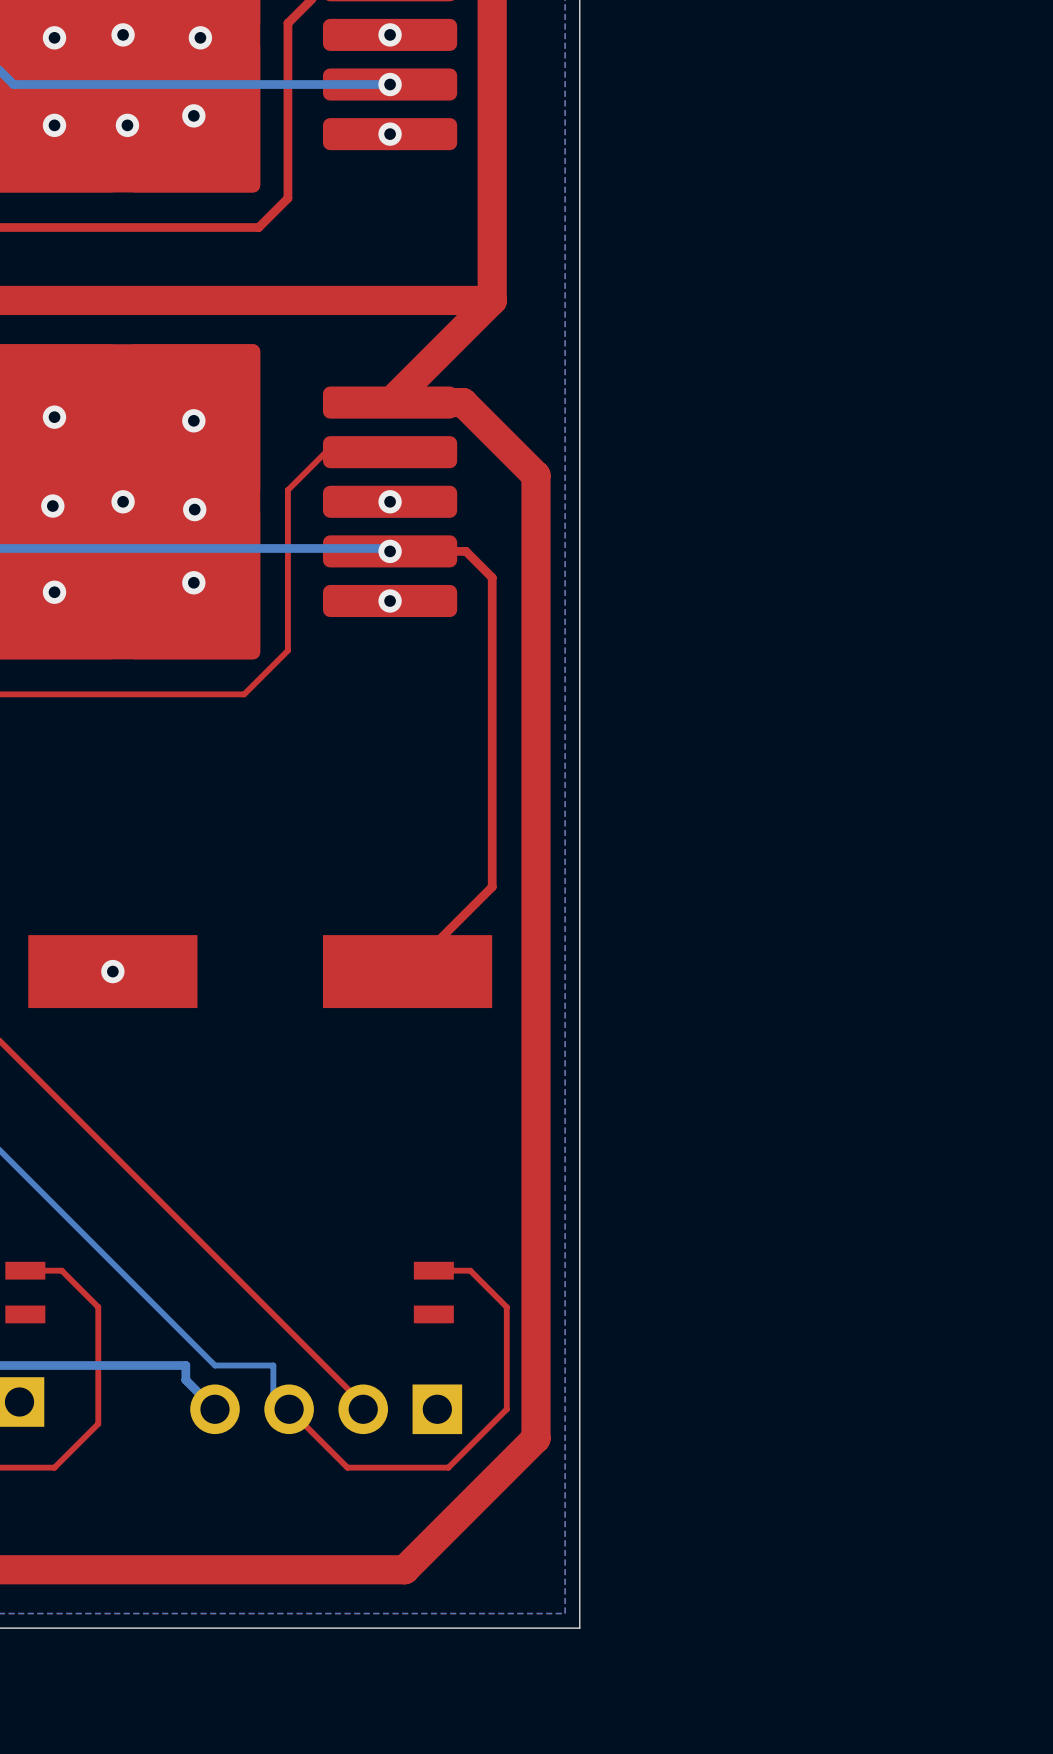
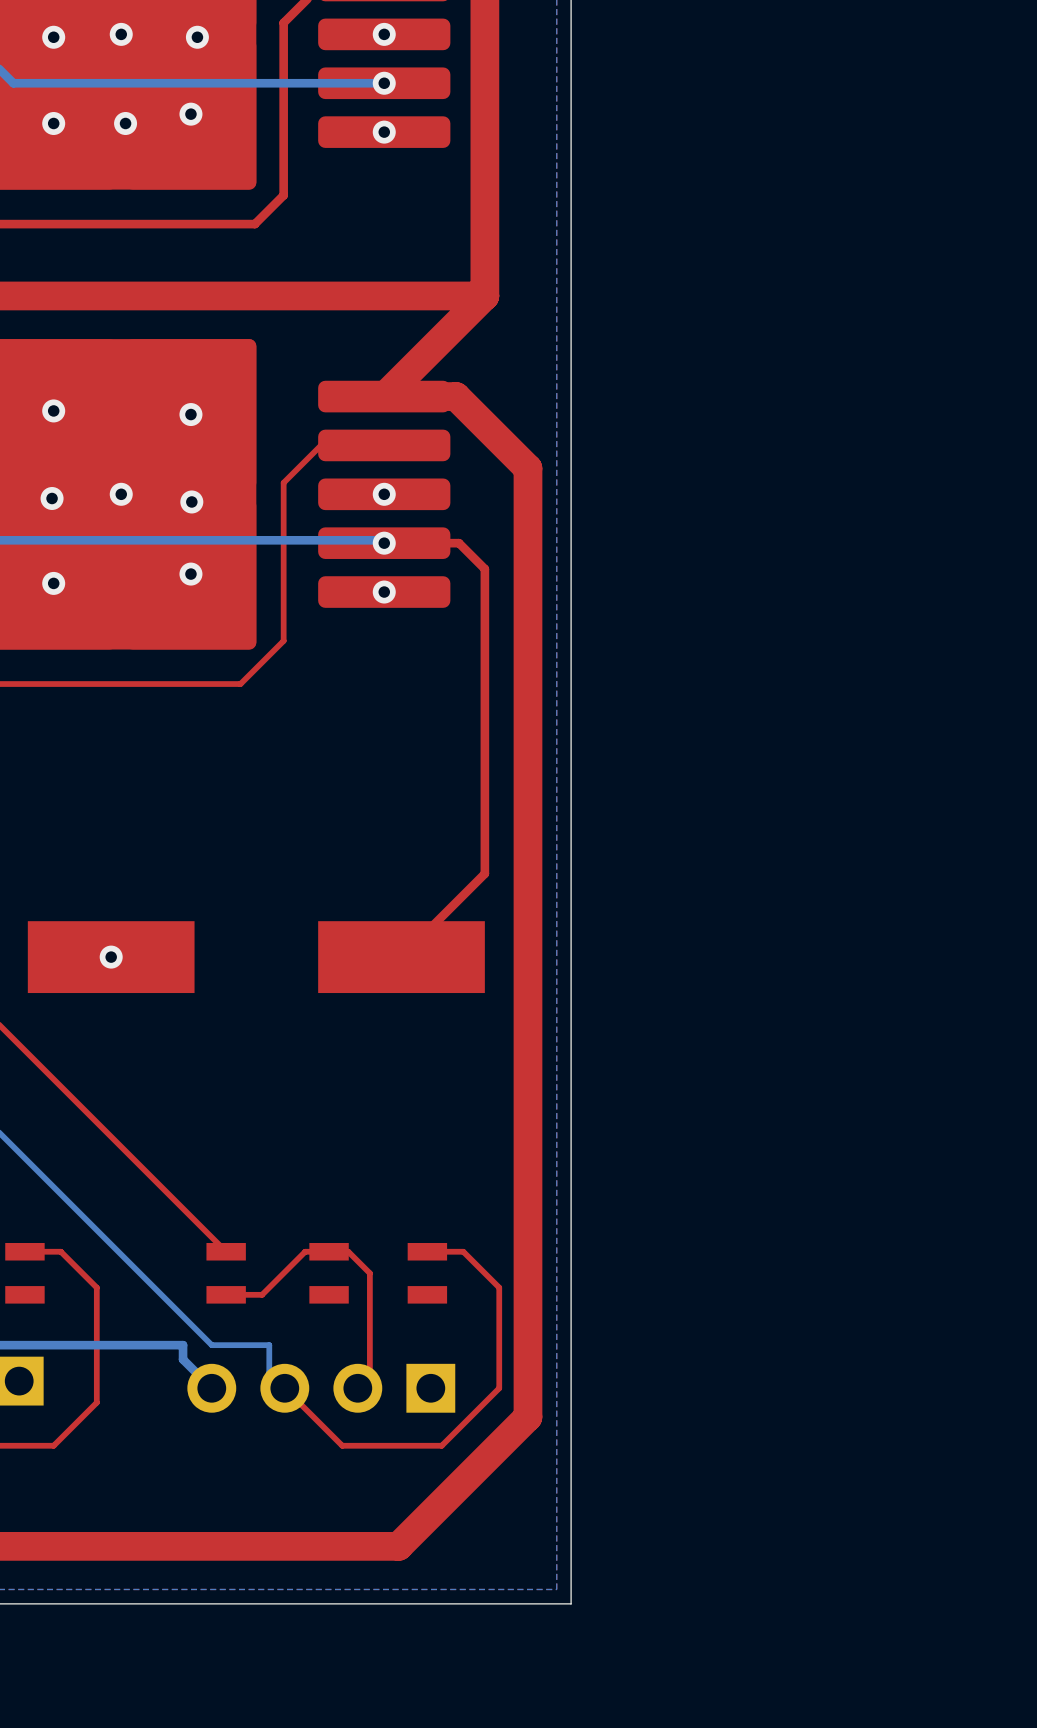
top track: (229, 1270) (363, 1404) (363, 1409) -> (226, 1294) (262, 1294) (305, 1251) (348, 1251) (369, 1273) (369, 1376) (357, 1388)
part: none -> (226, 1273)
part: none -> (329, 1273)

